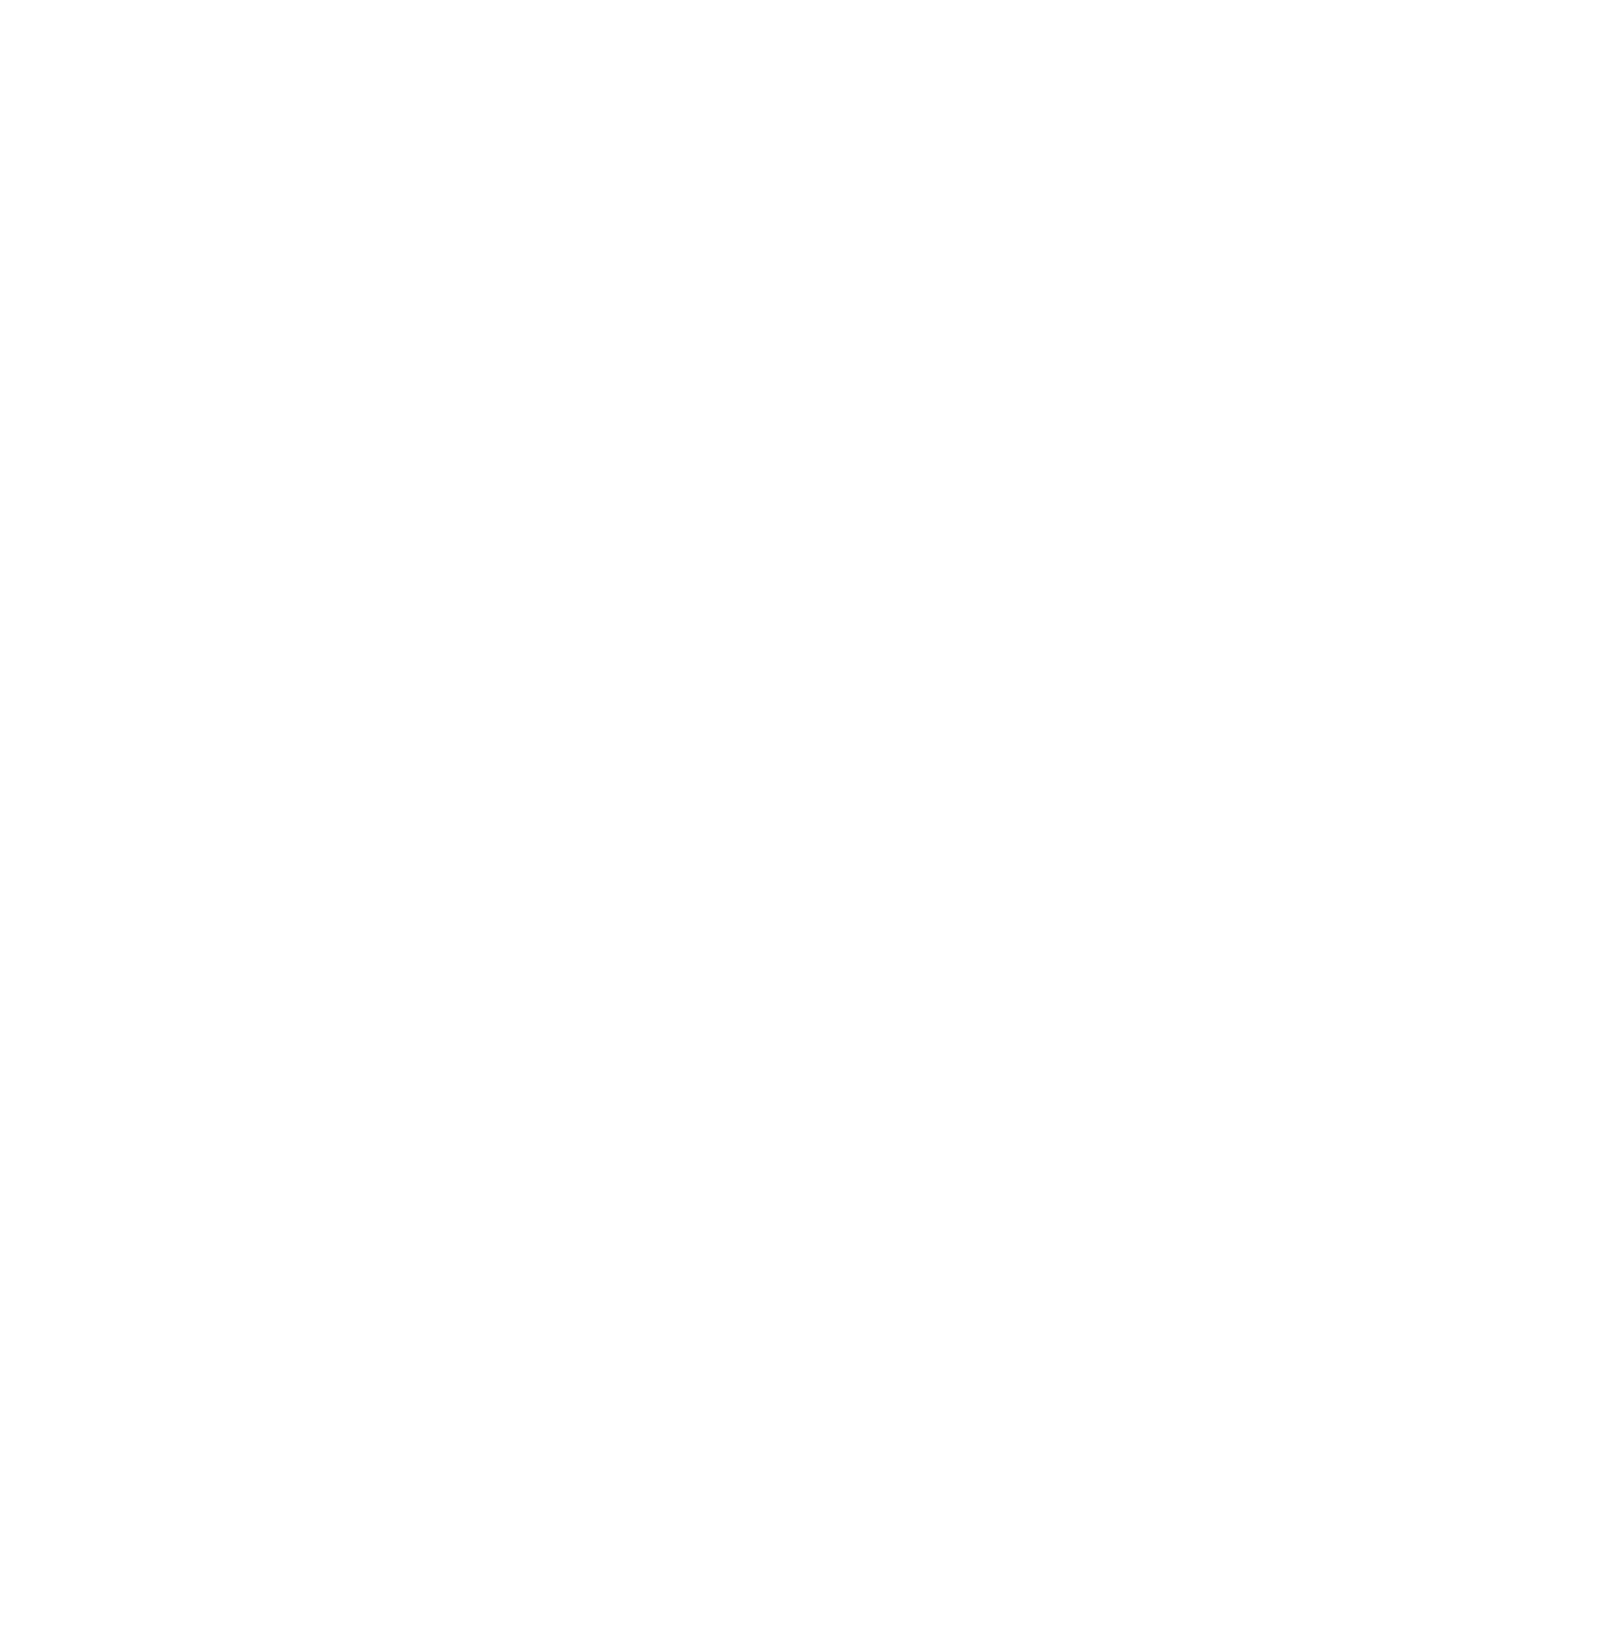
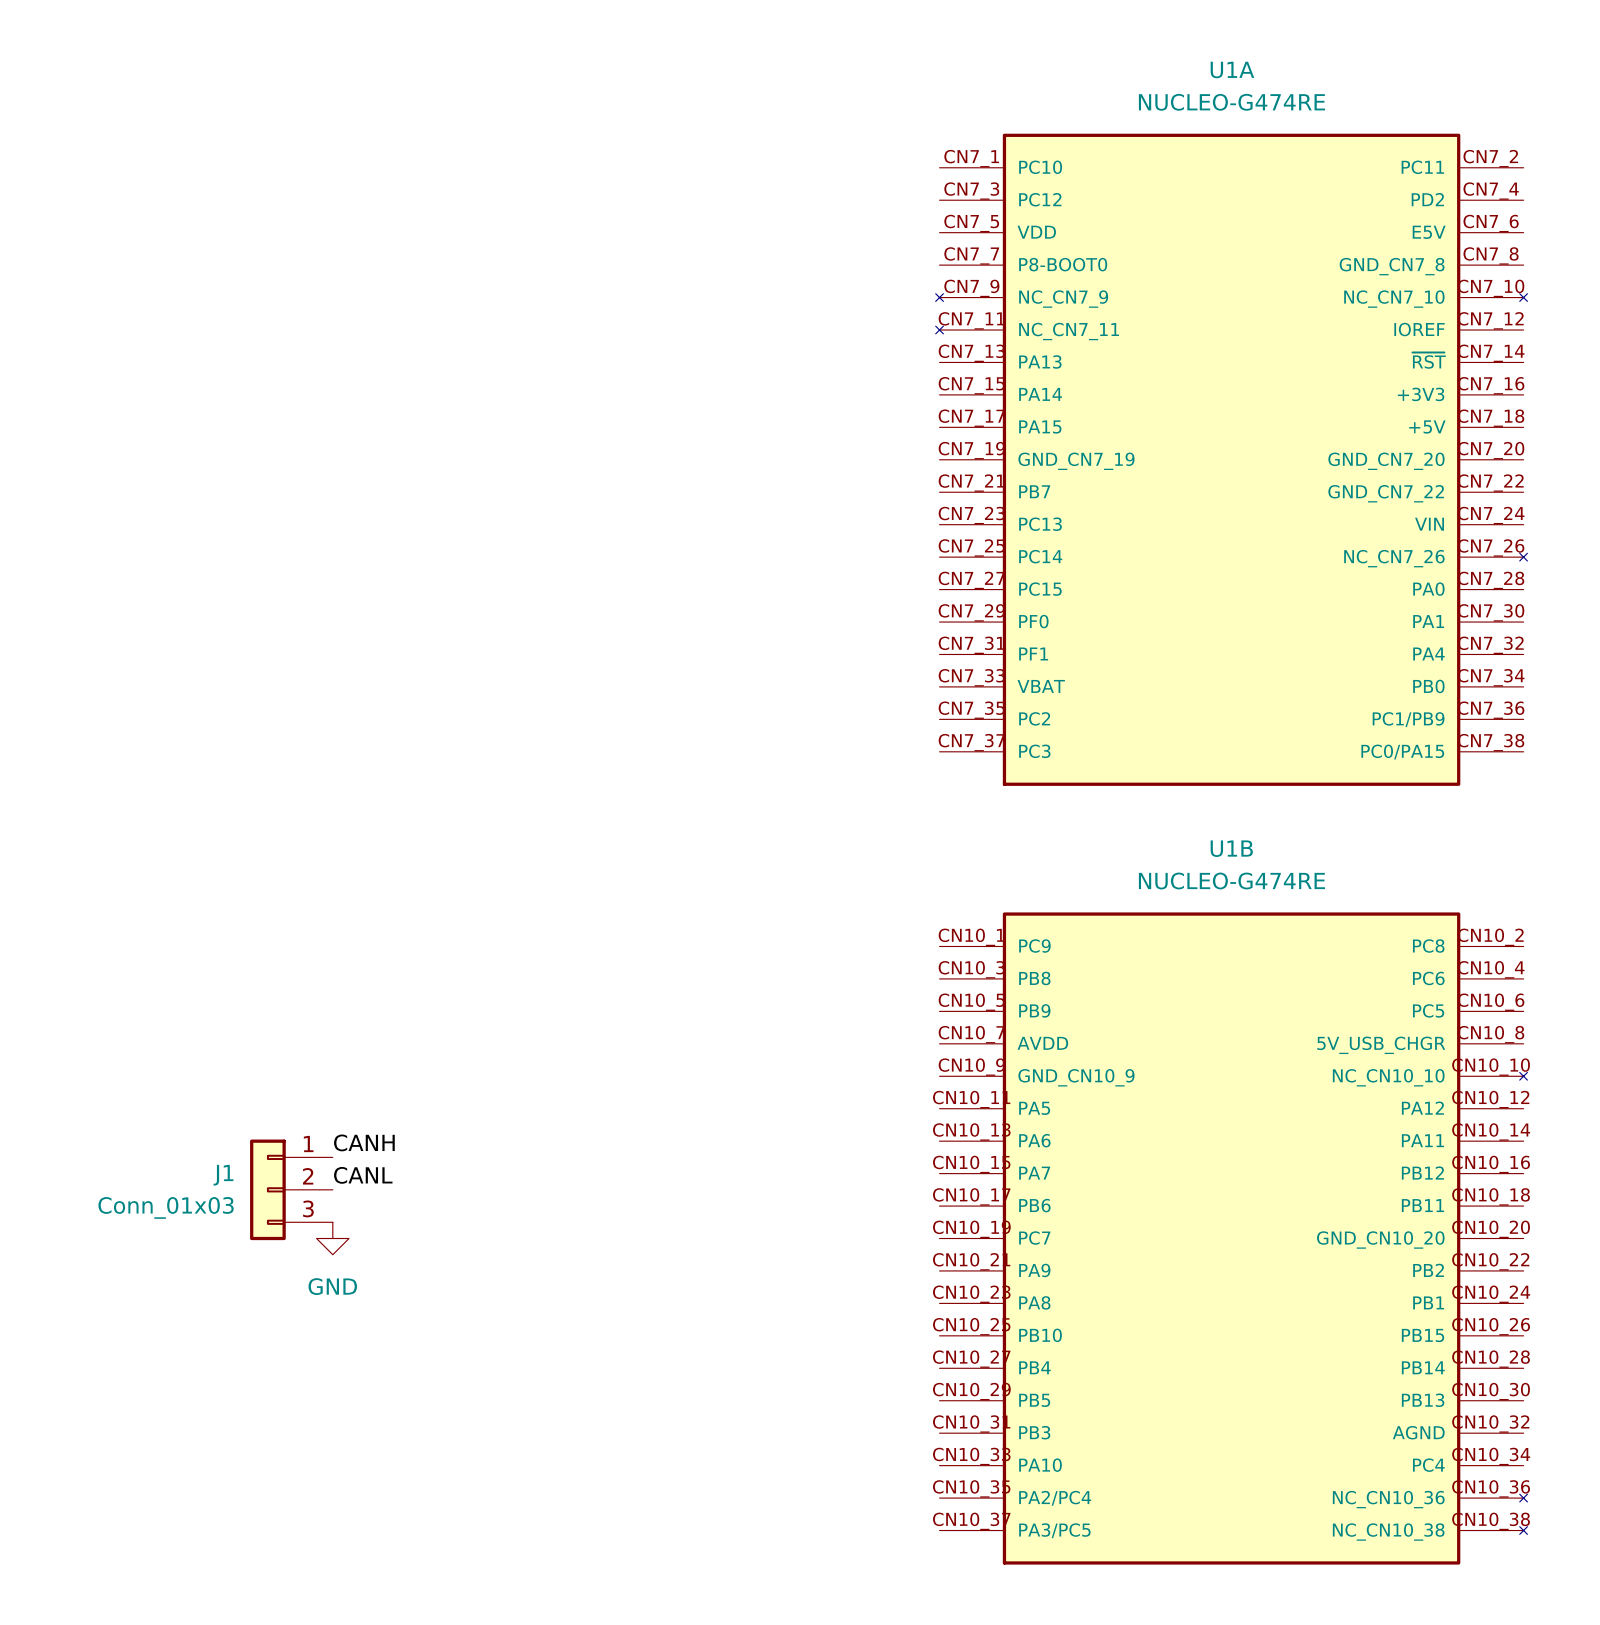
U1A: none -> NUCLEO-G474RE (1231, 459)
label: none -> CANH (364, 1142)
label: none -> CANL (363, 1175)
J1: none -> Conn_01x03 (291, 1189)
power symbol: none -> GND (332, 1238)
U1B: none -> NUCLEO-G474RE (1233, 1238)

